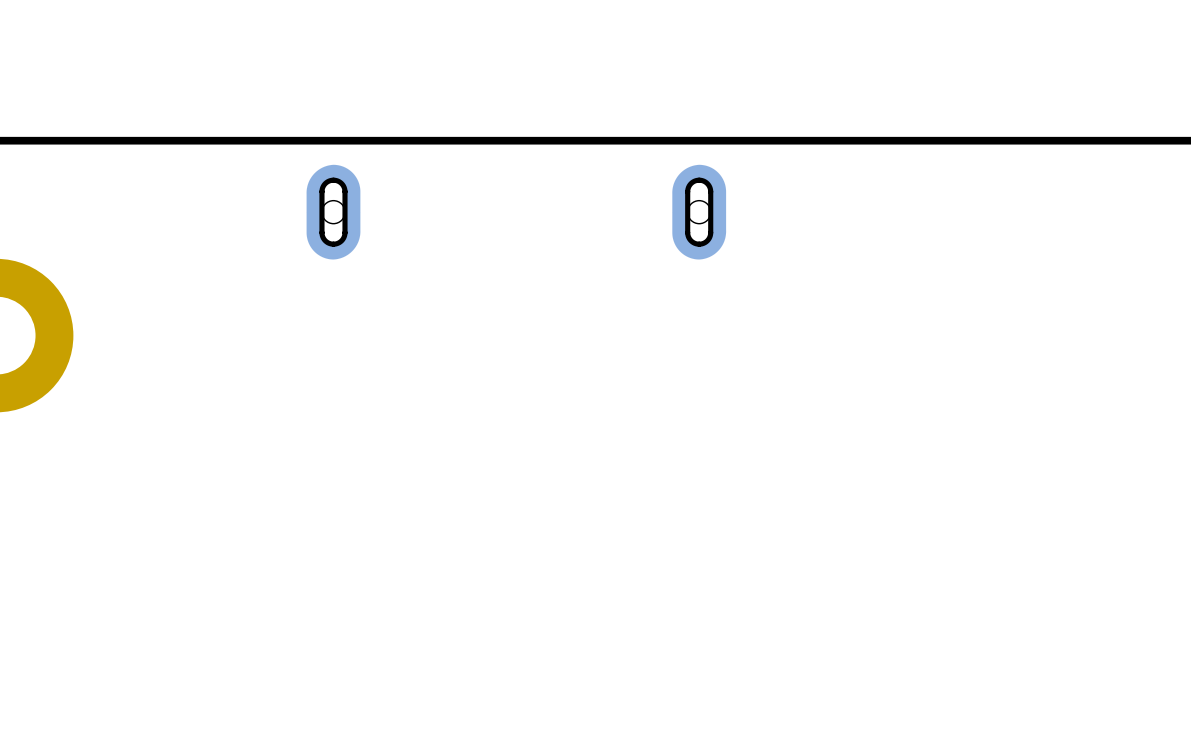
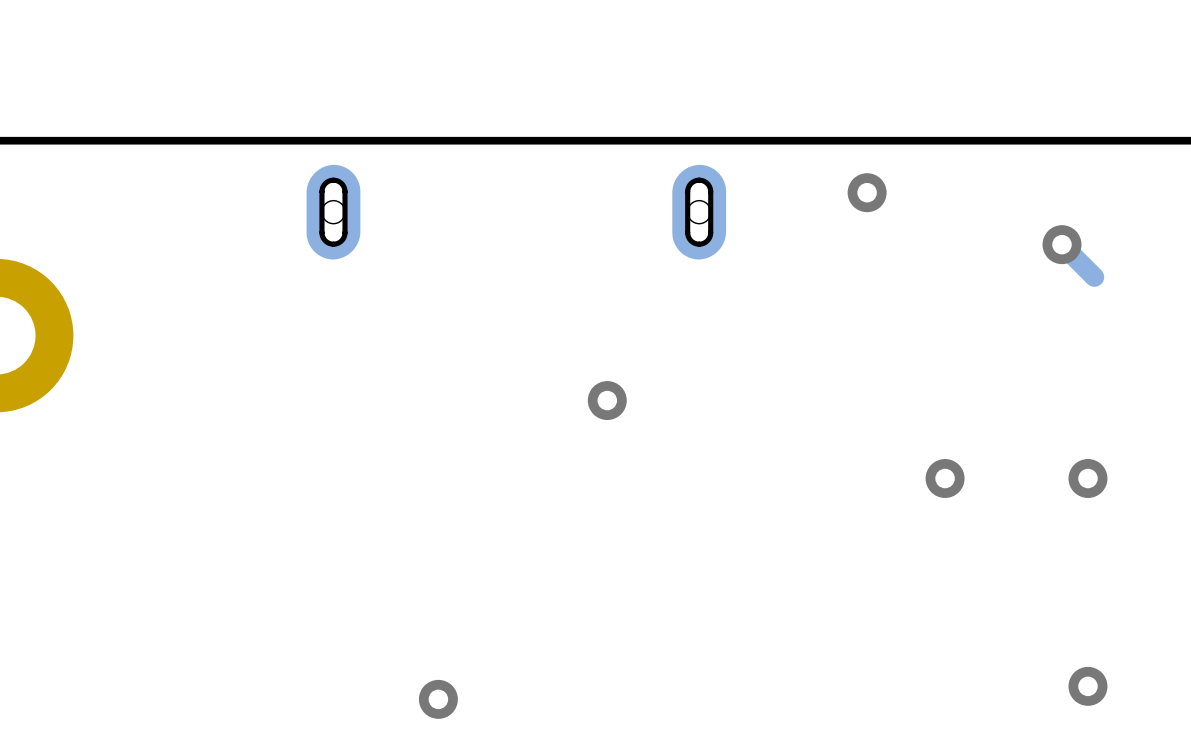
via: none -> (867, 192)
track: none -> (1062, 244) (1094, 277)
via: none -> (1062, 244)
via: none -> (607, 400)
via: none -> (945, 478)
via: none -> (1087, 478)
via: none -> (1087, 686)
via: none -> (438, 699)

